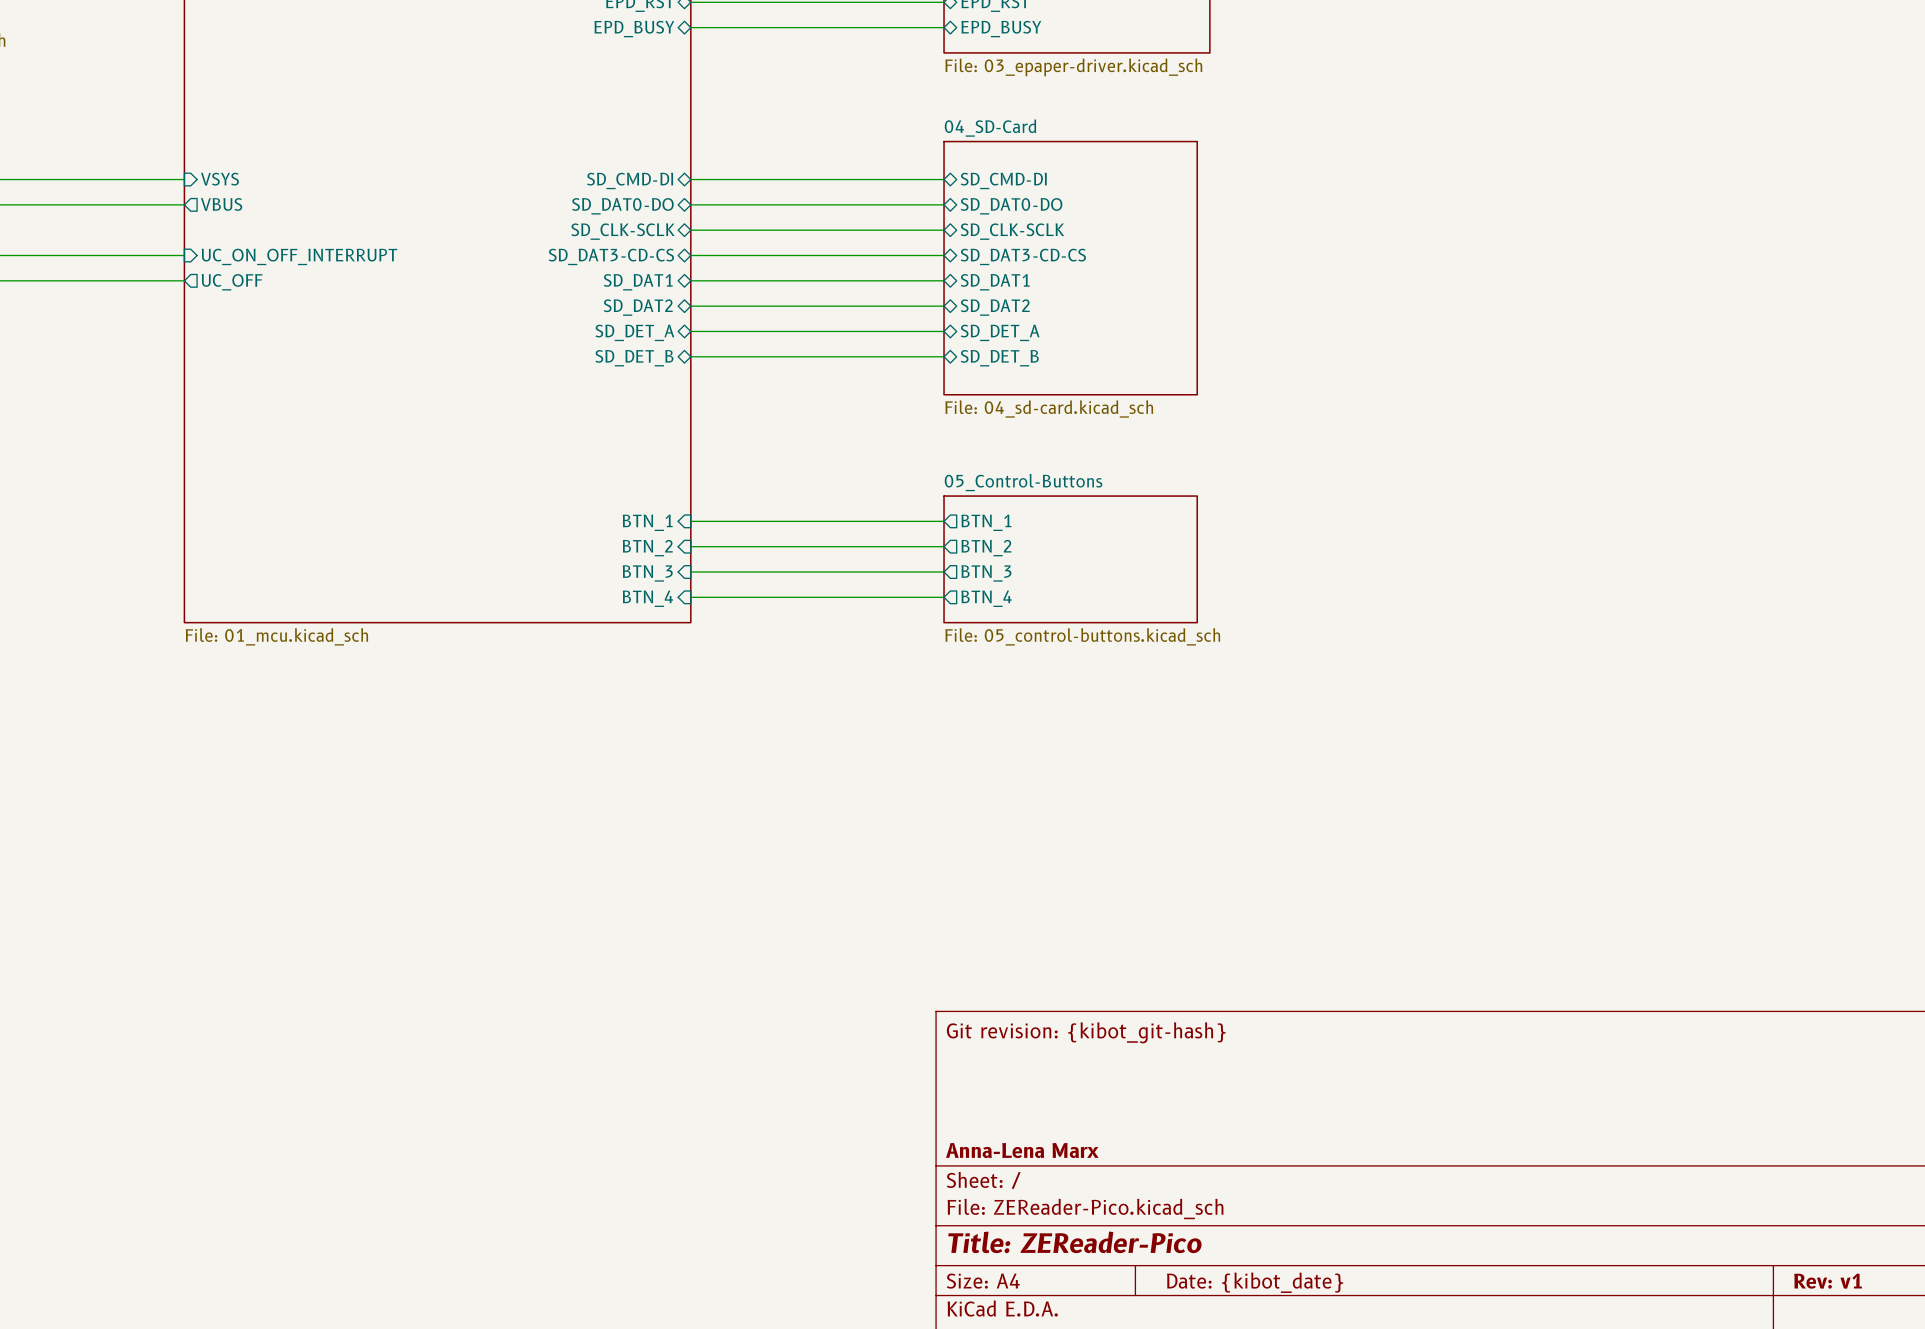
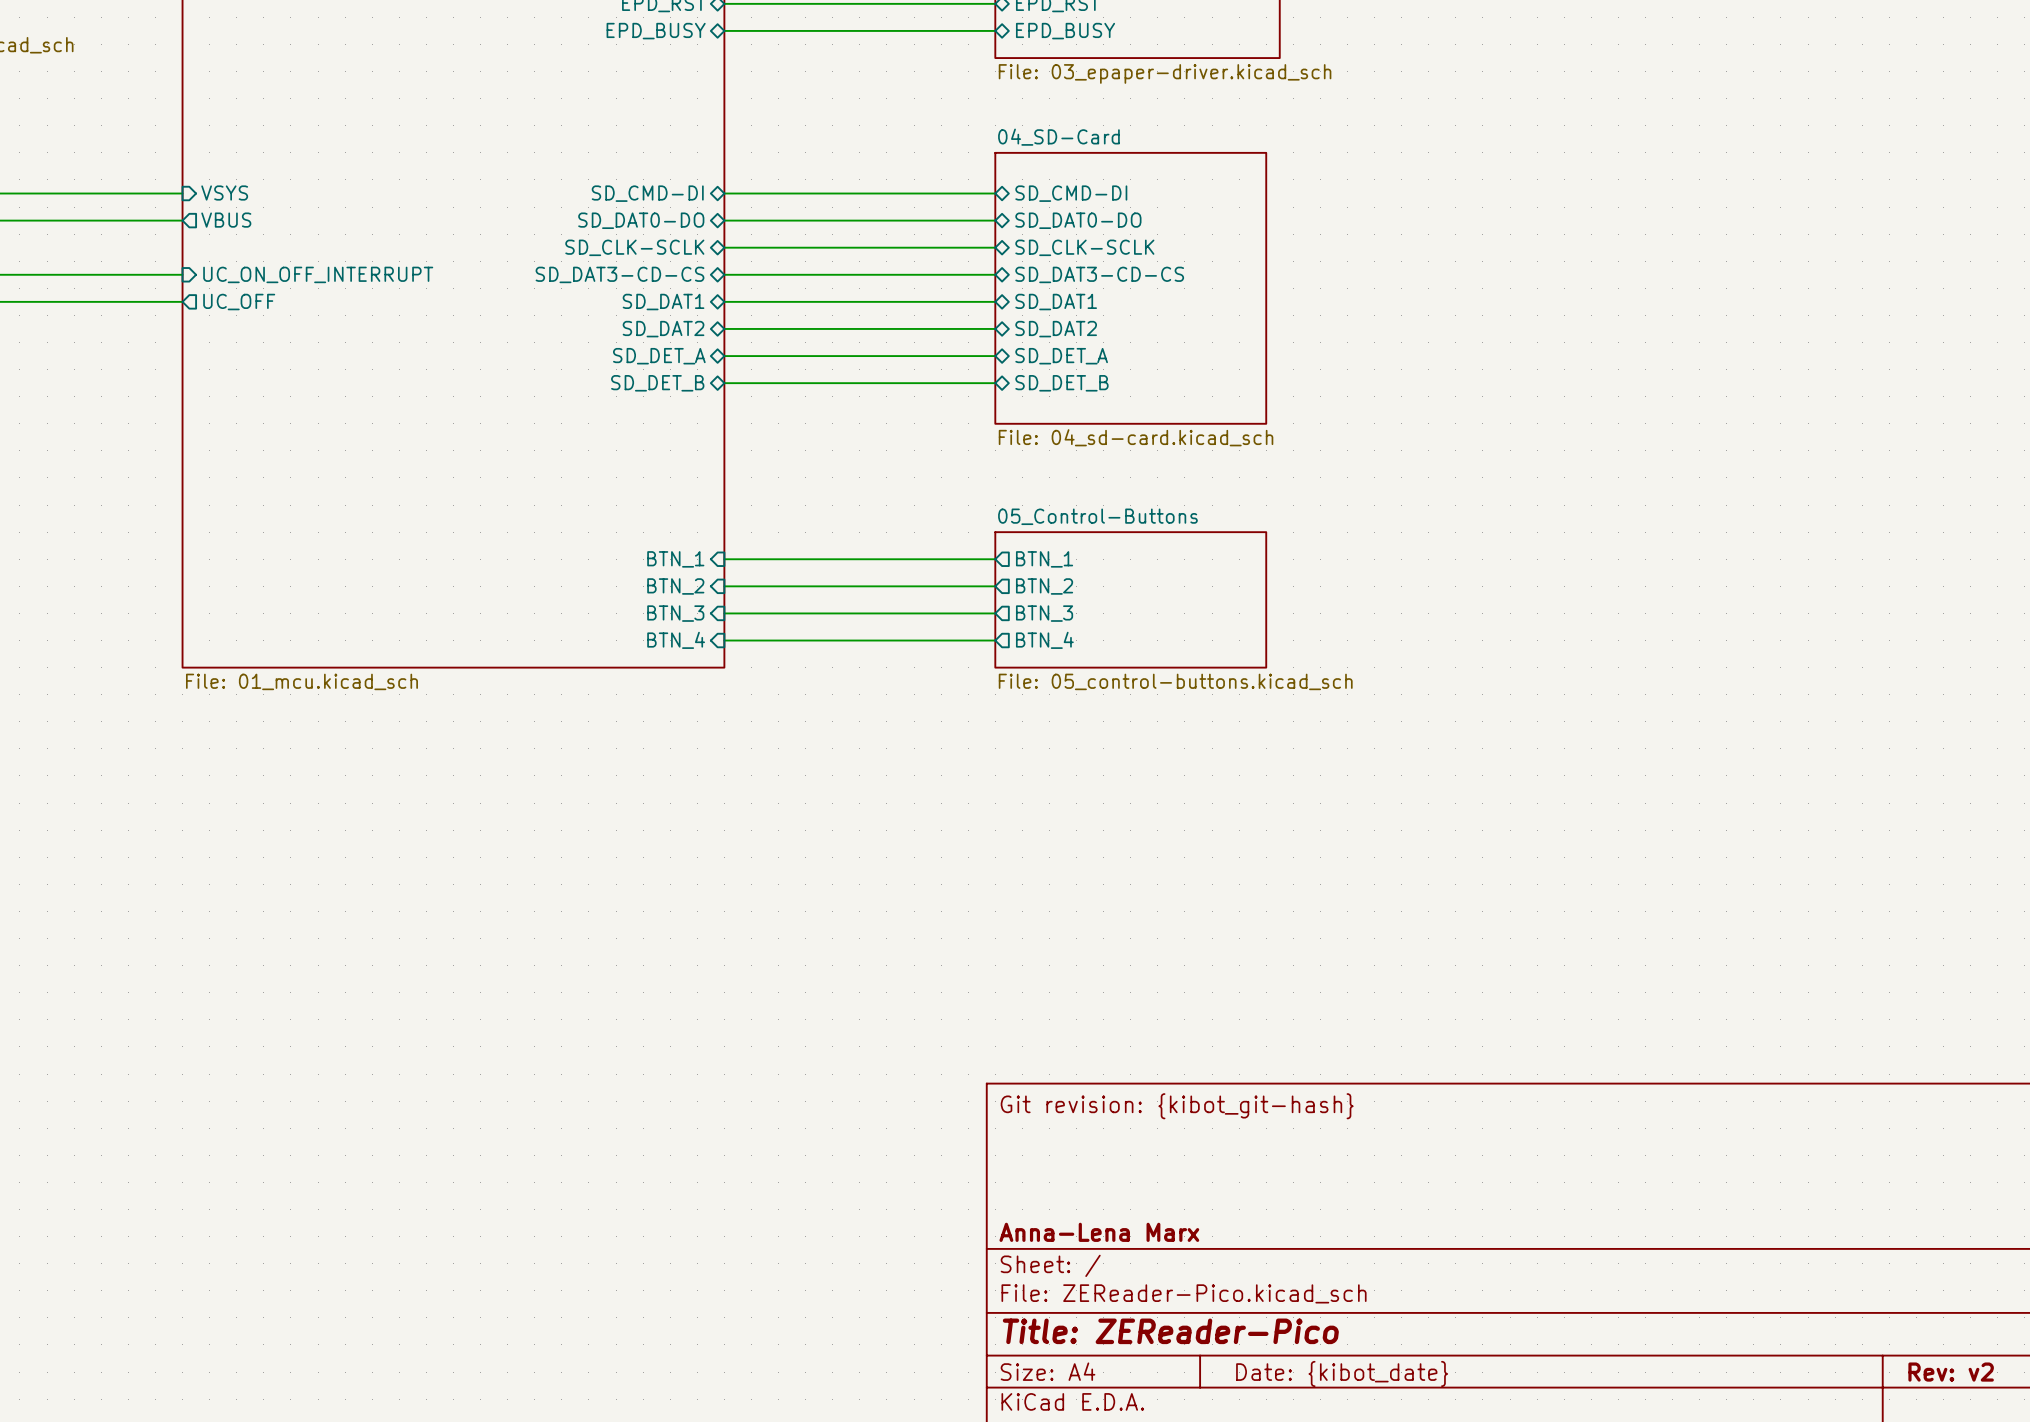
title block: Rev: v1 (1828, 1281) -> Rev: v2 (1951, 1372)

